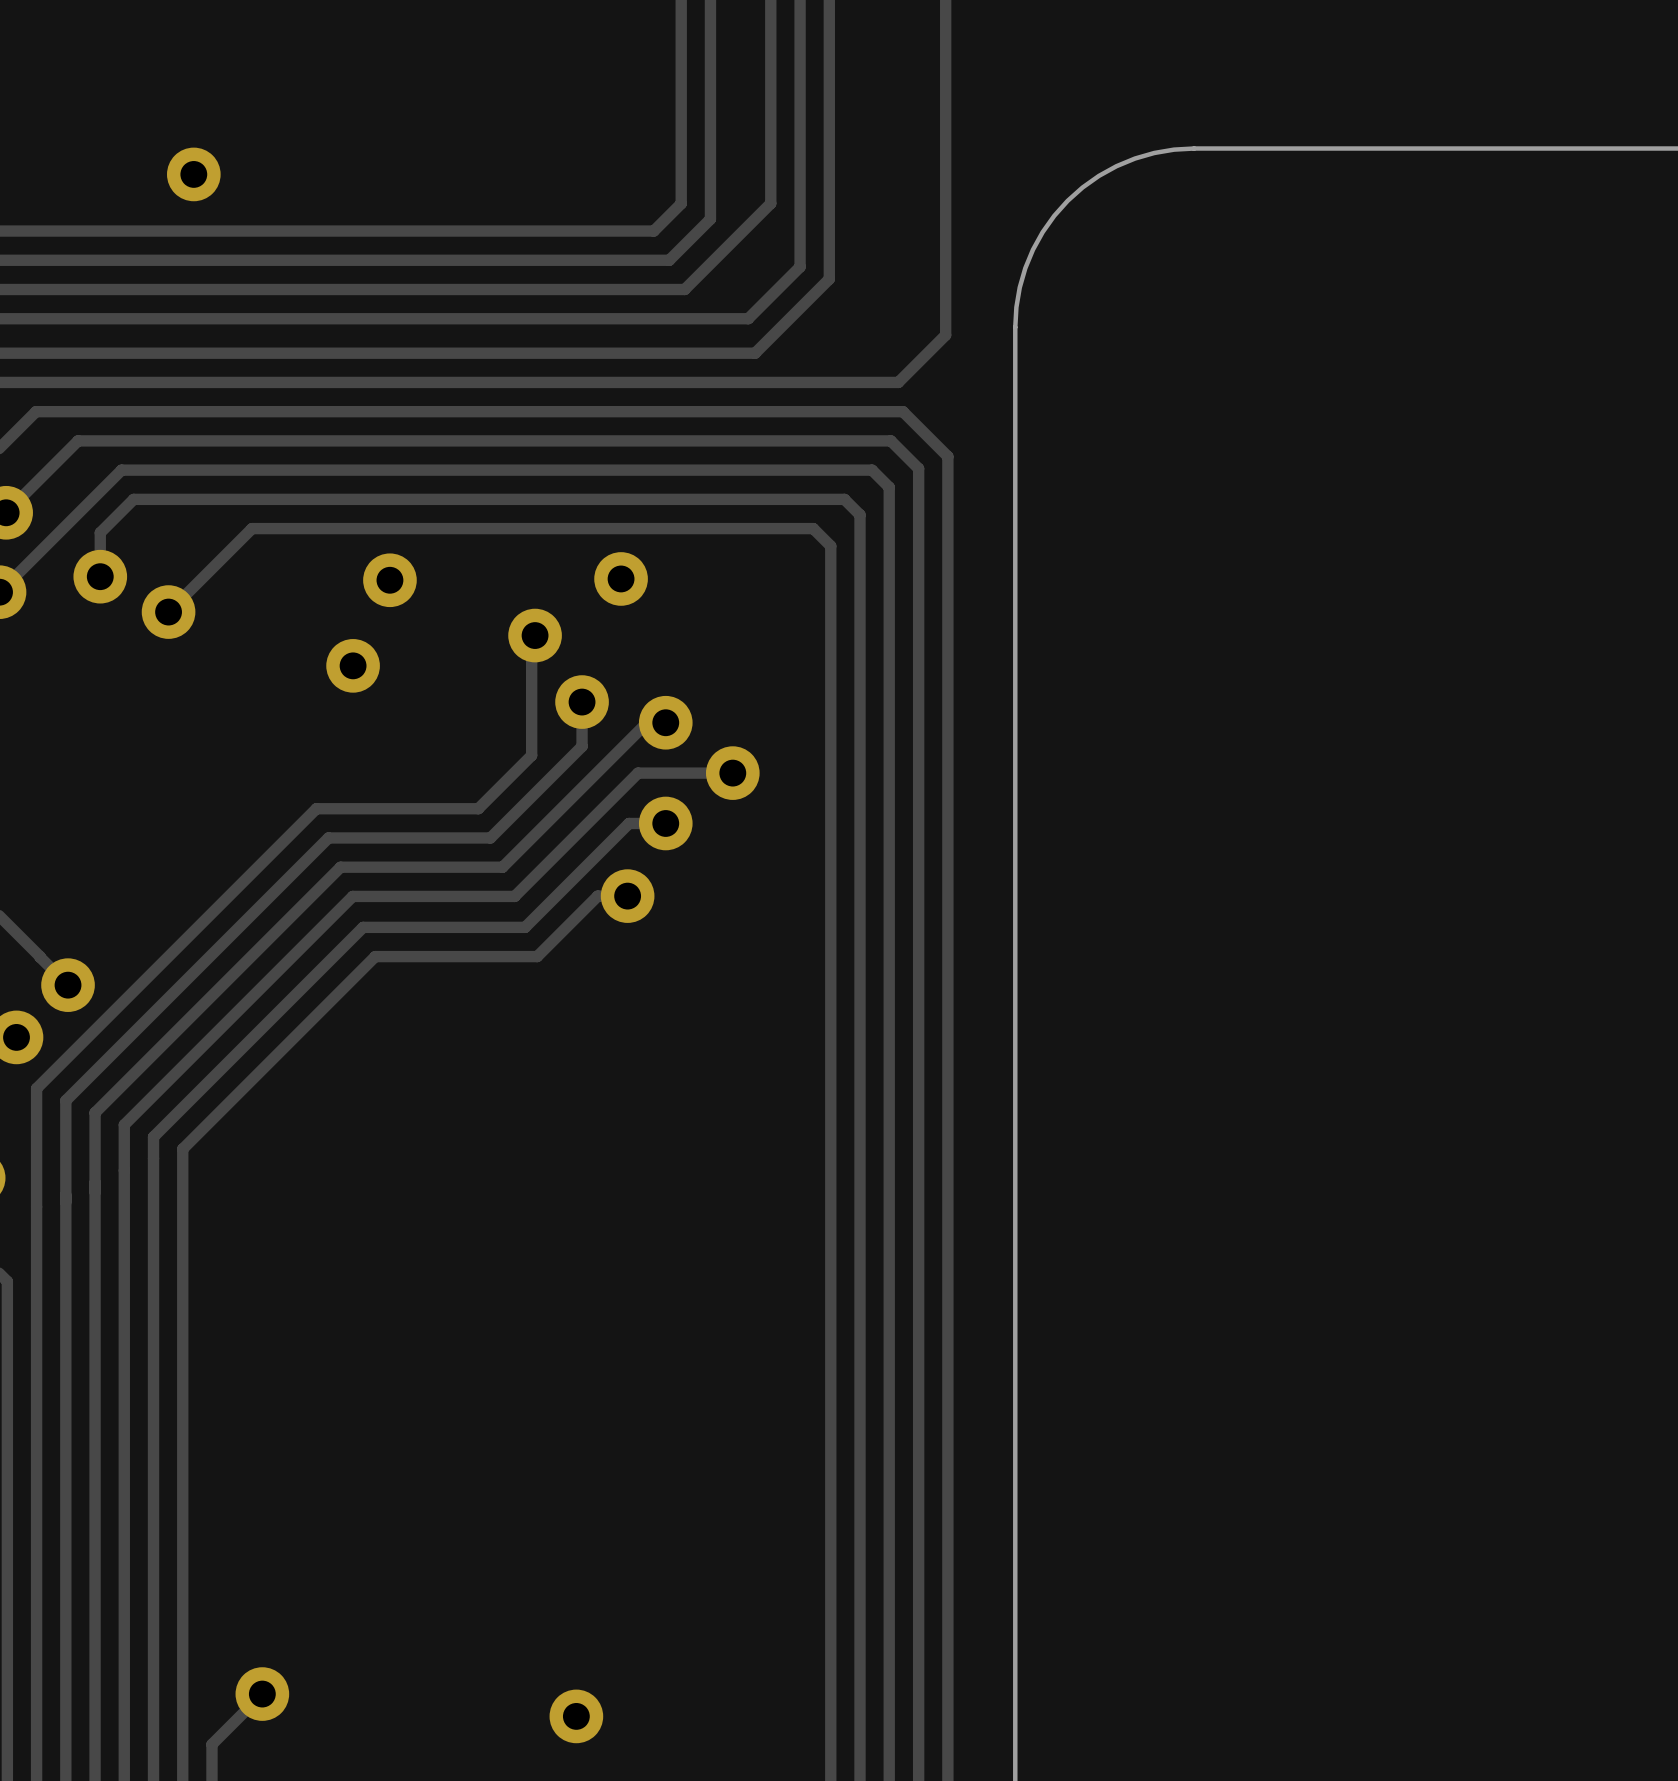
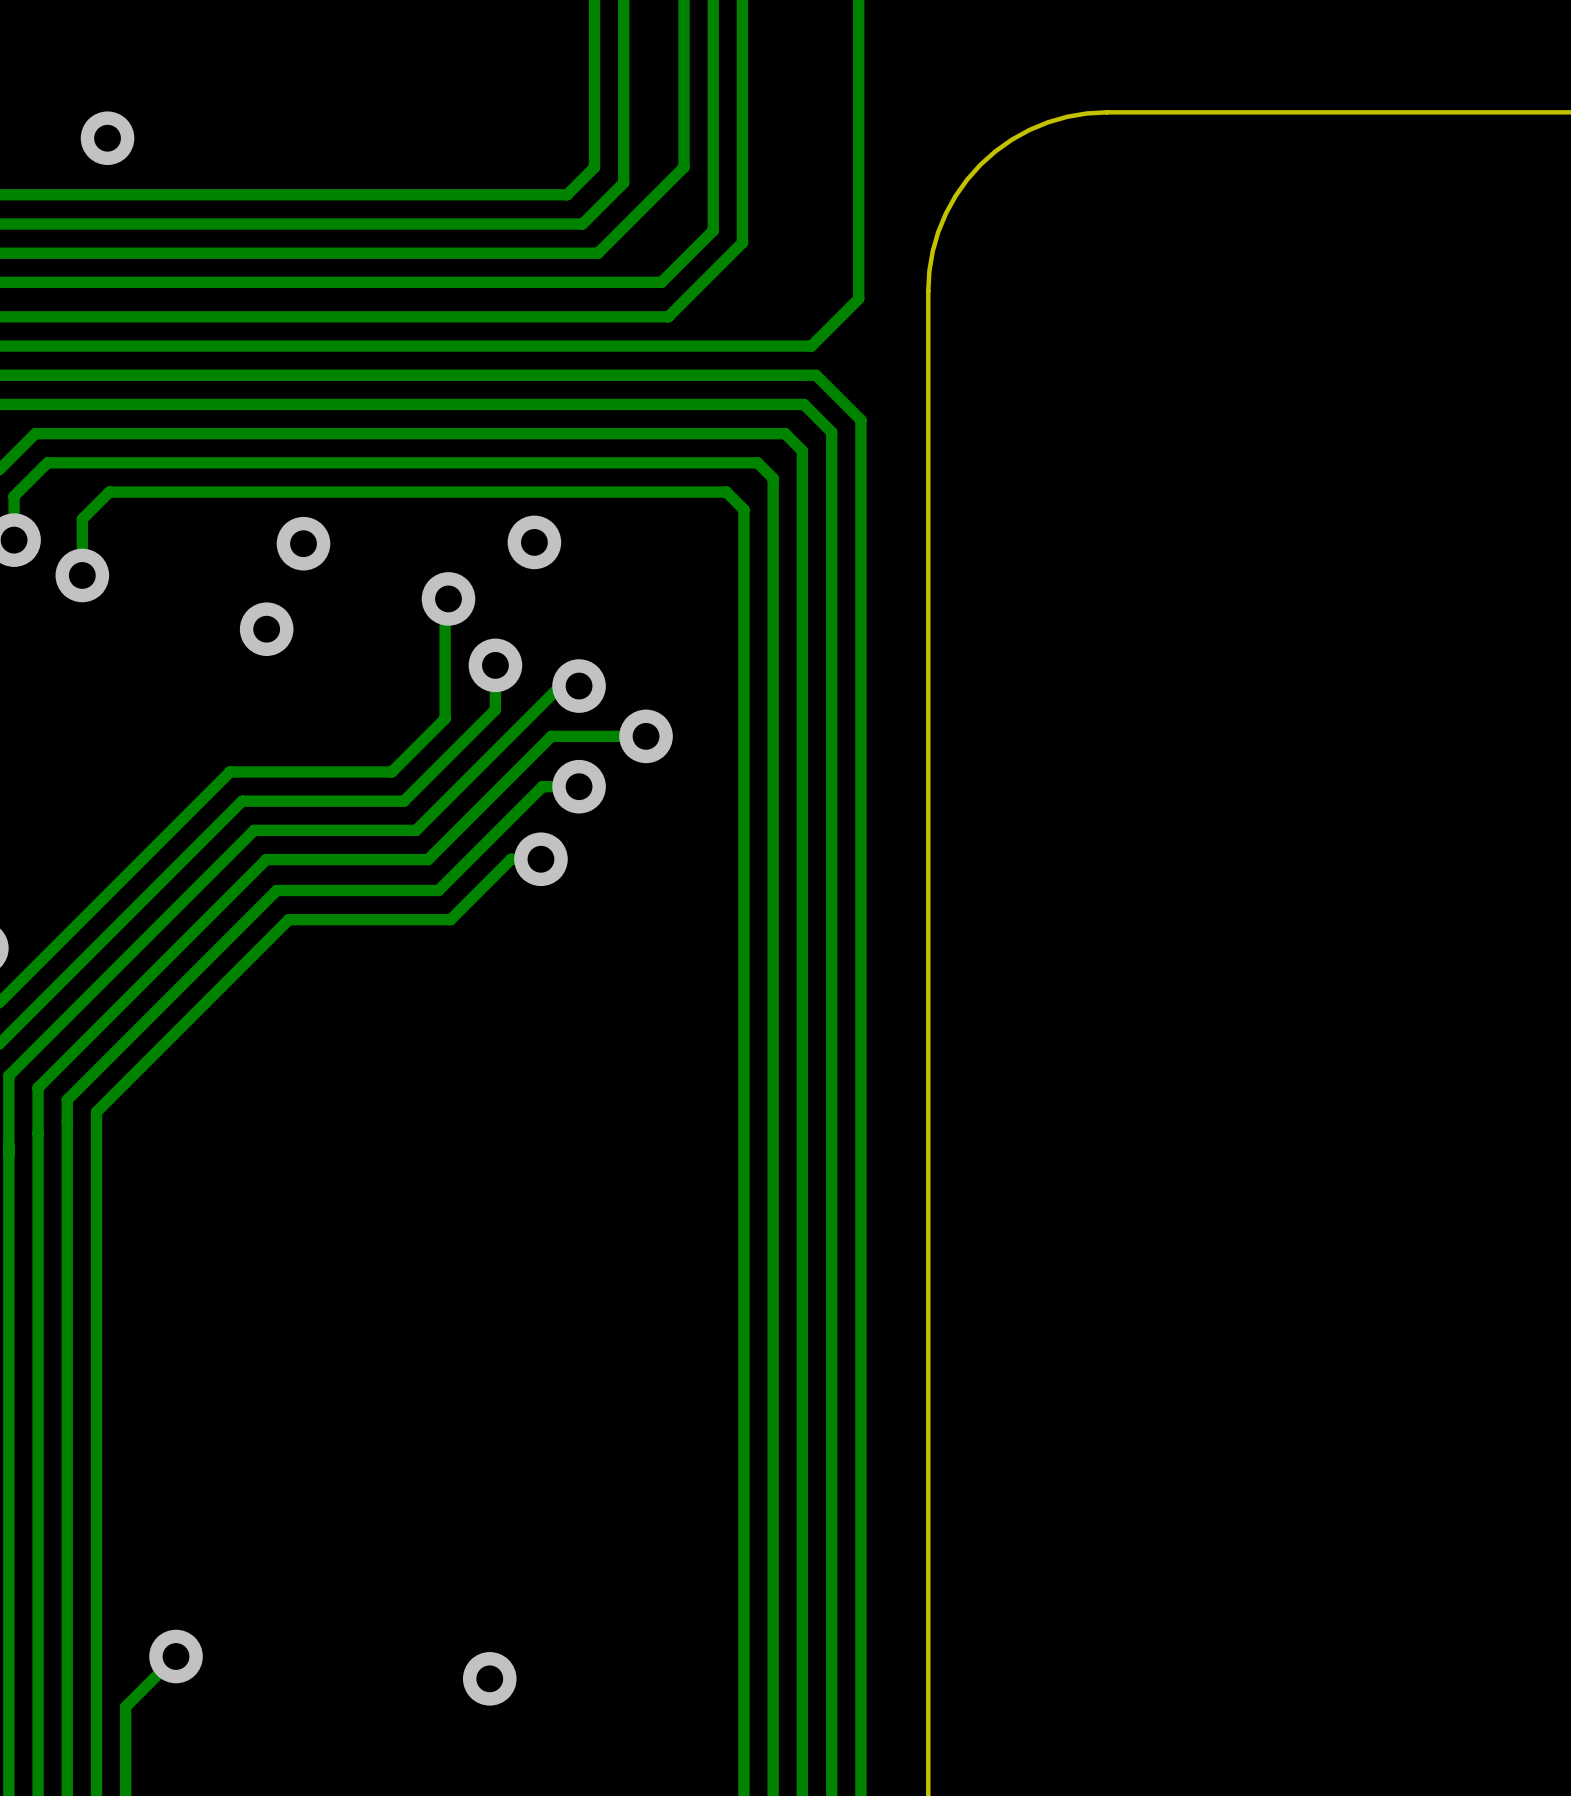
track: (252, 528) (168, 612) -> (165, 492) (109, 492) (82, 519) (82, 575)

